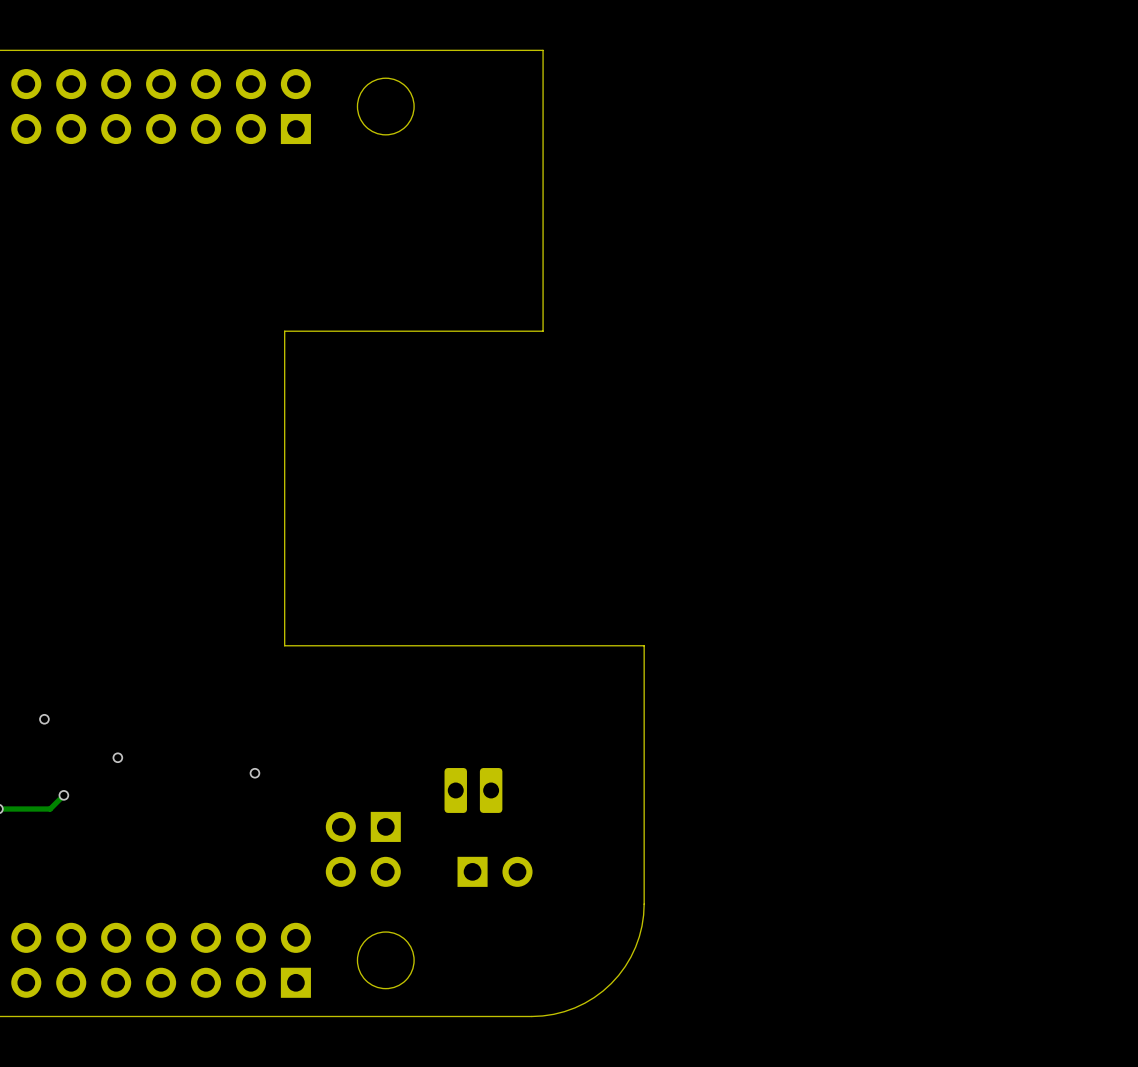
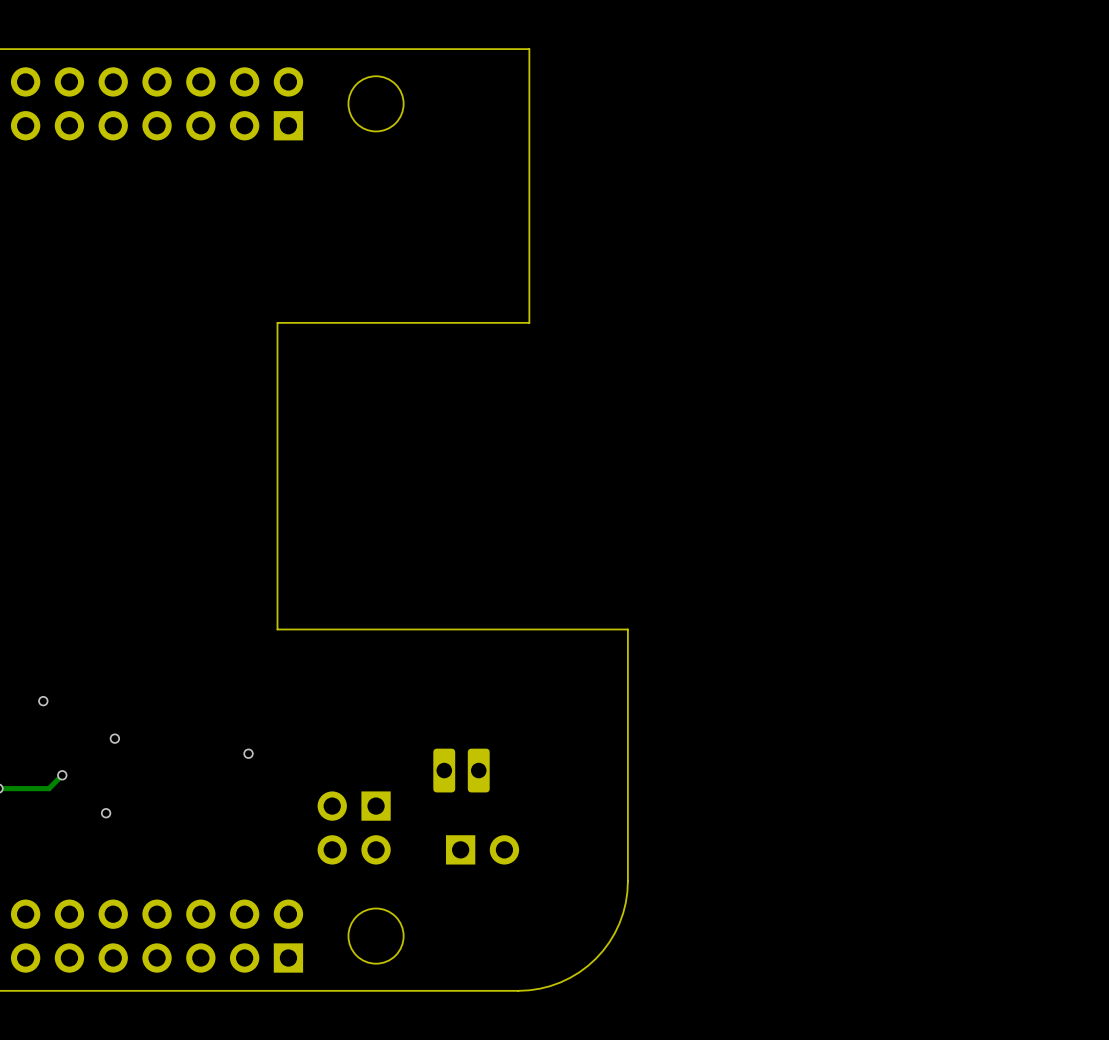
via: none -> (106, 813)

